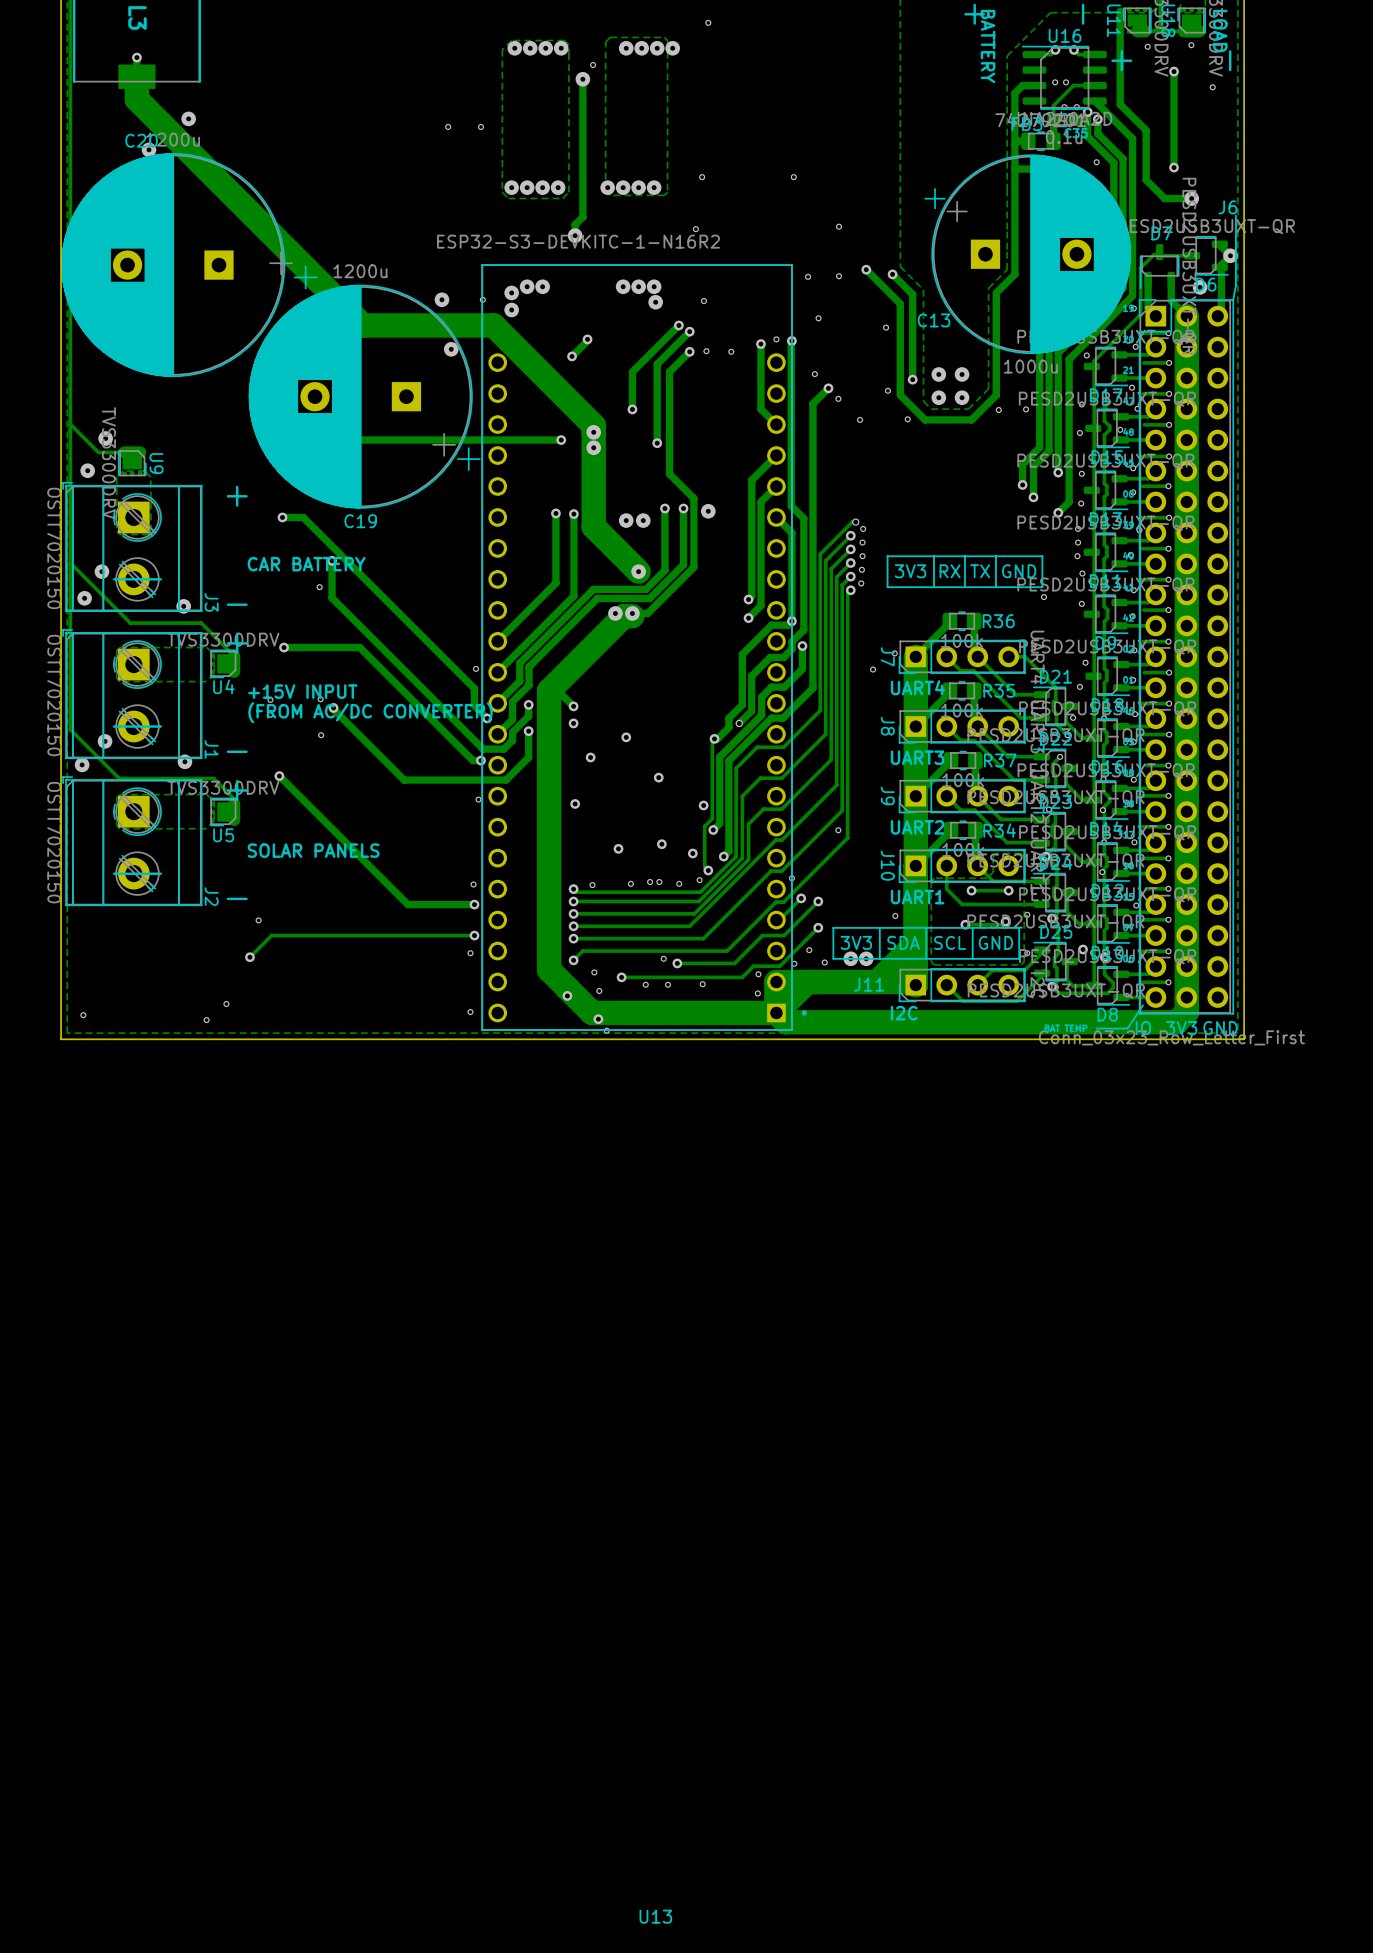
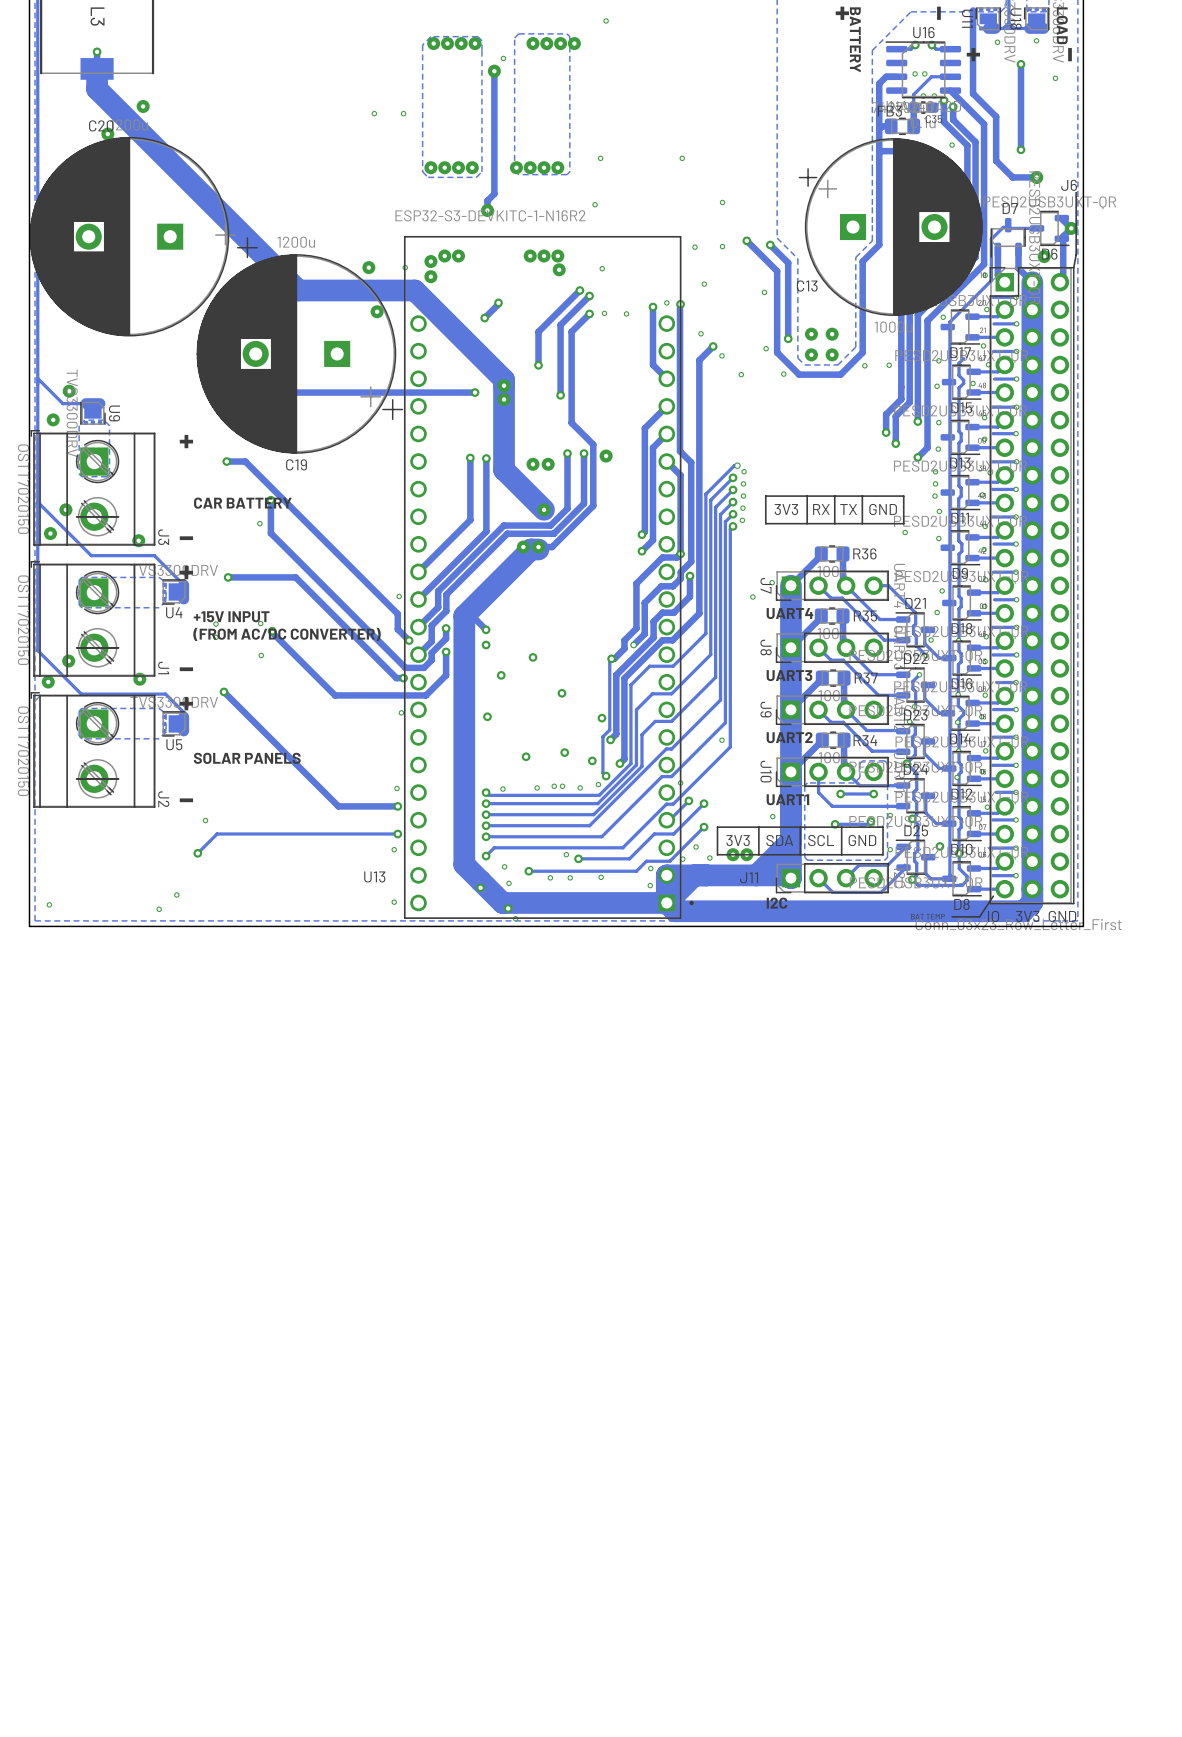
U13 name position: U13 (655, 1916) -> U13 (374, 876)

